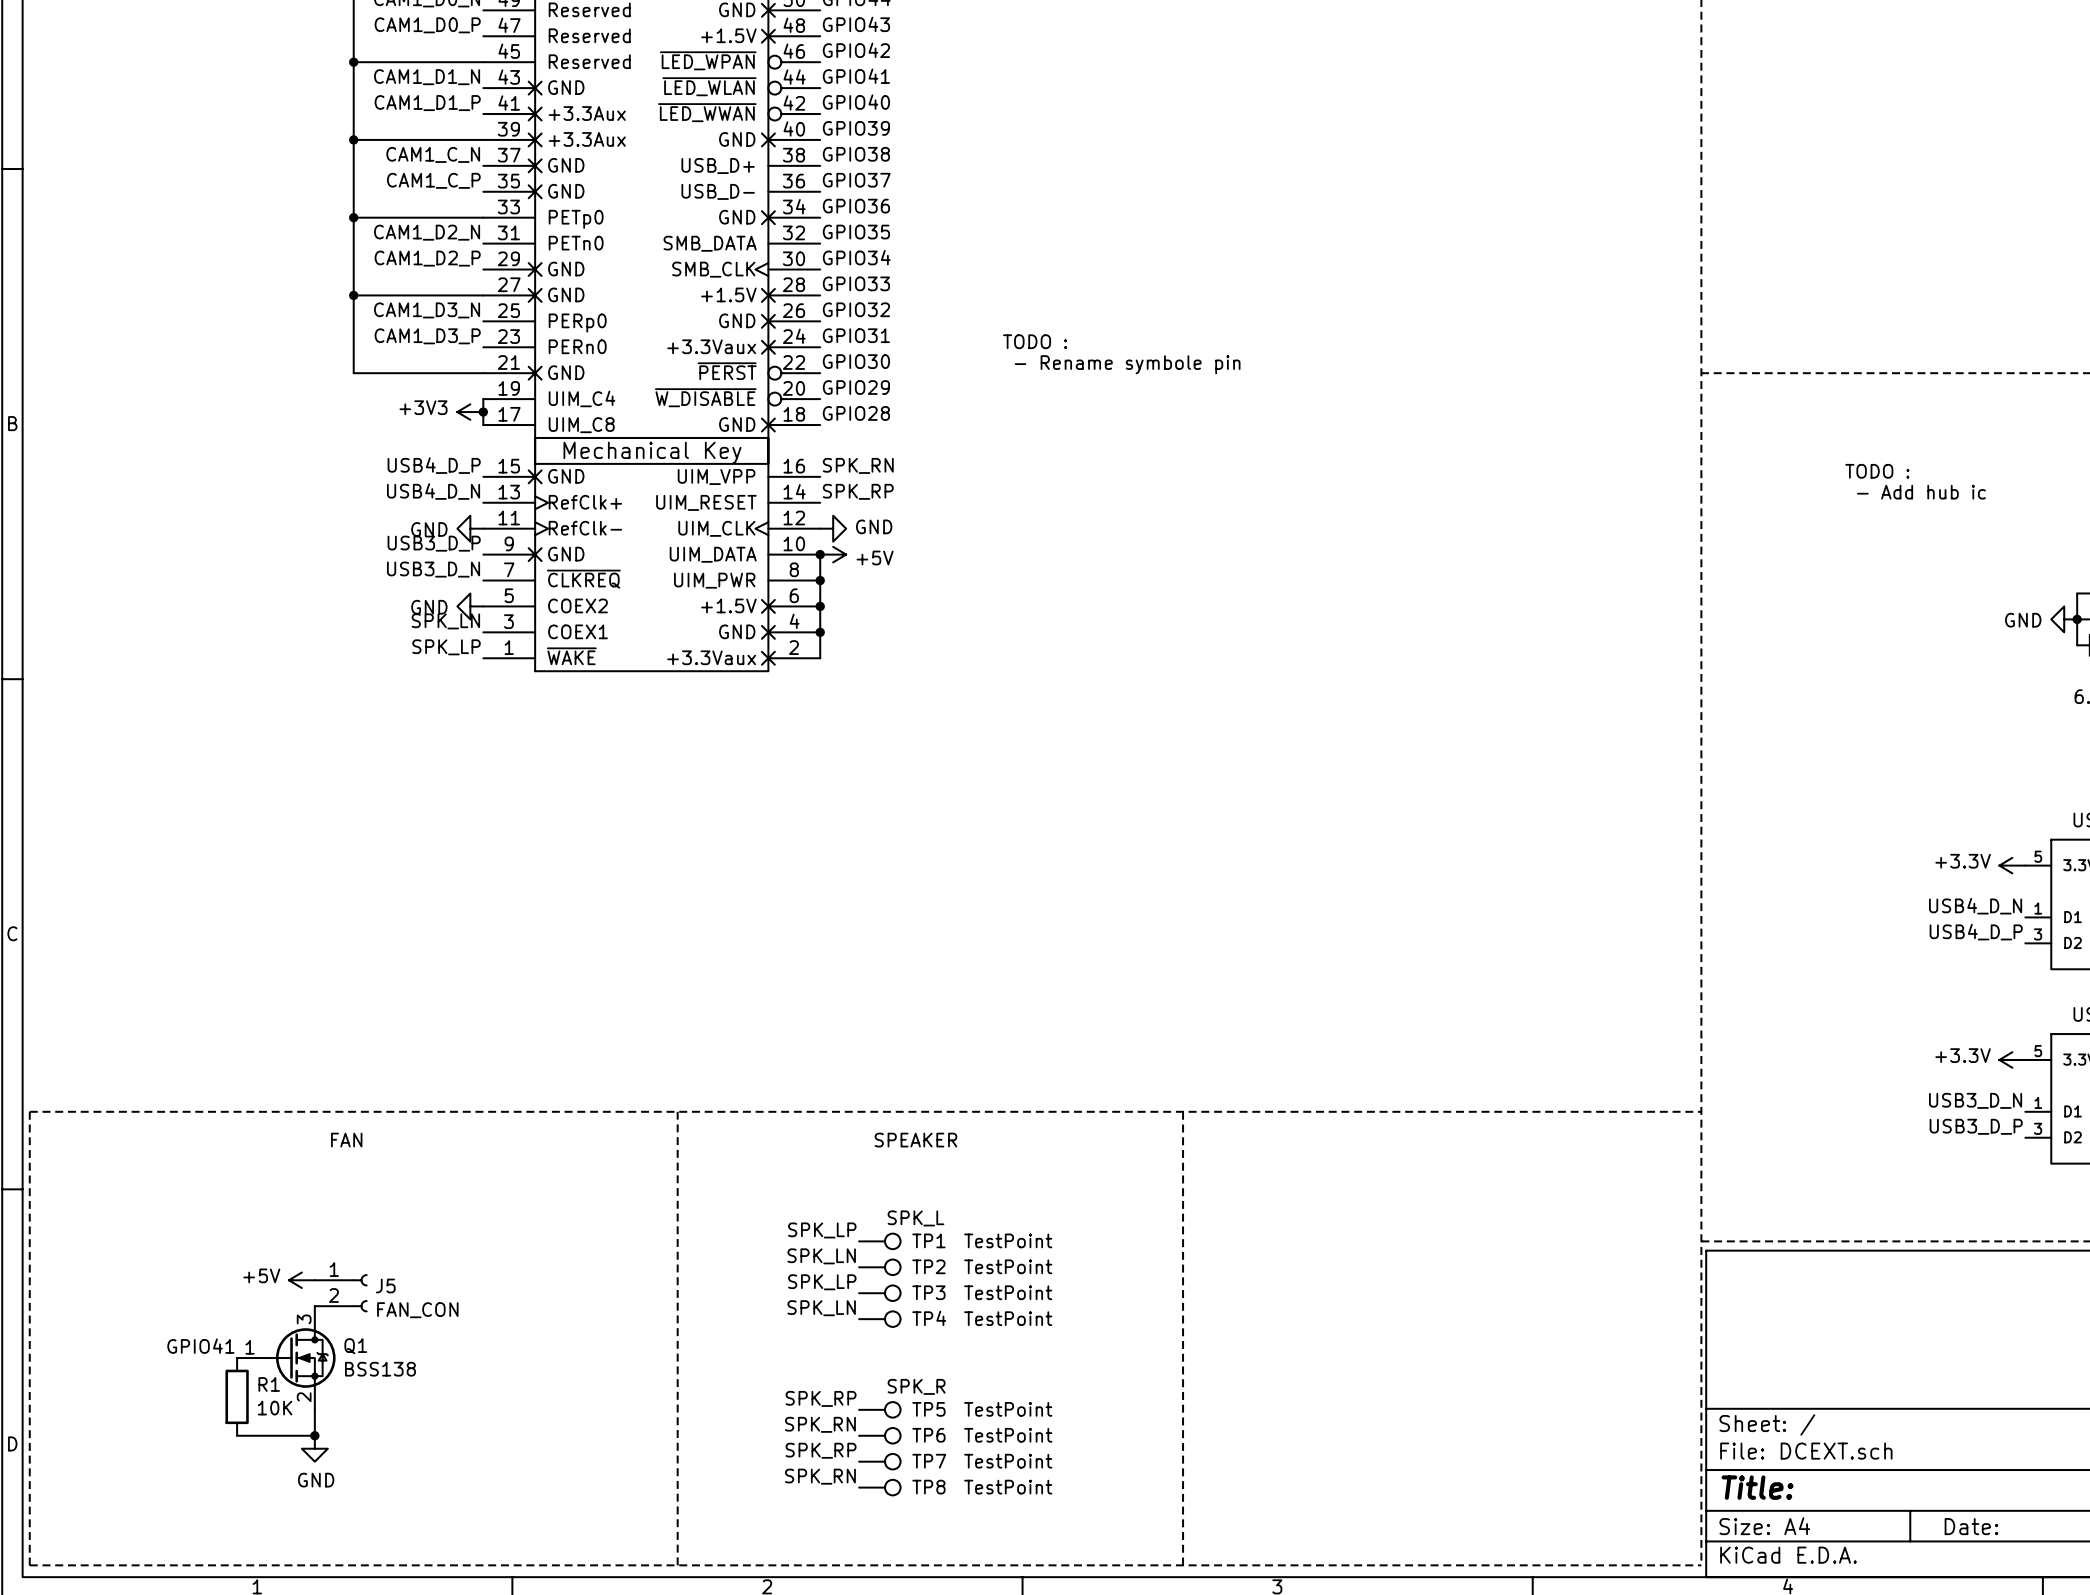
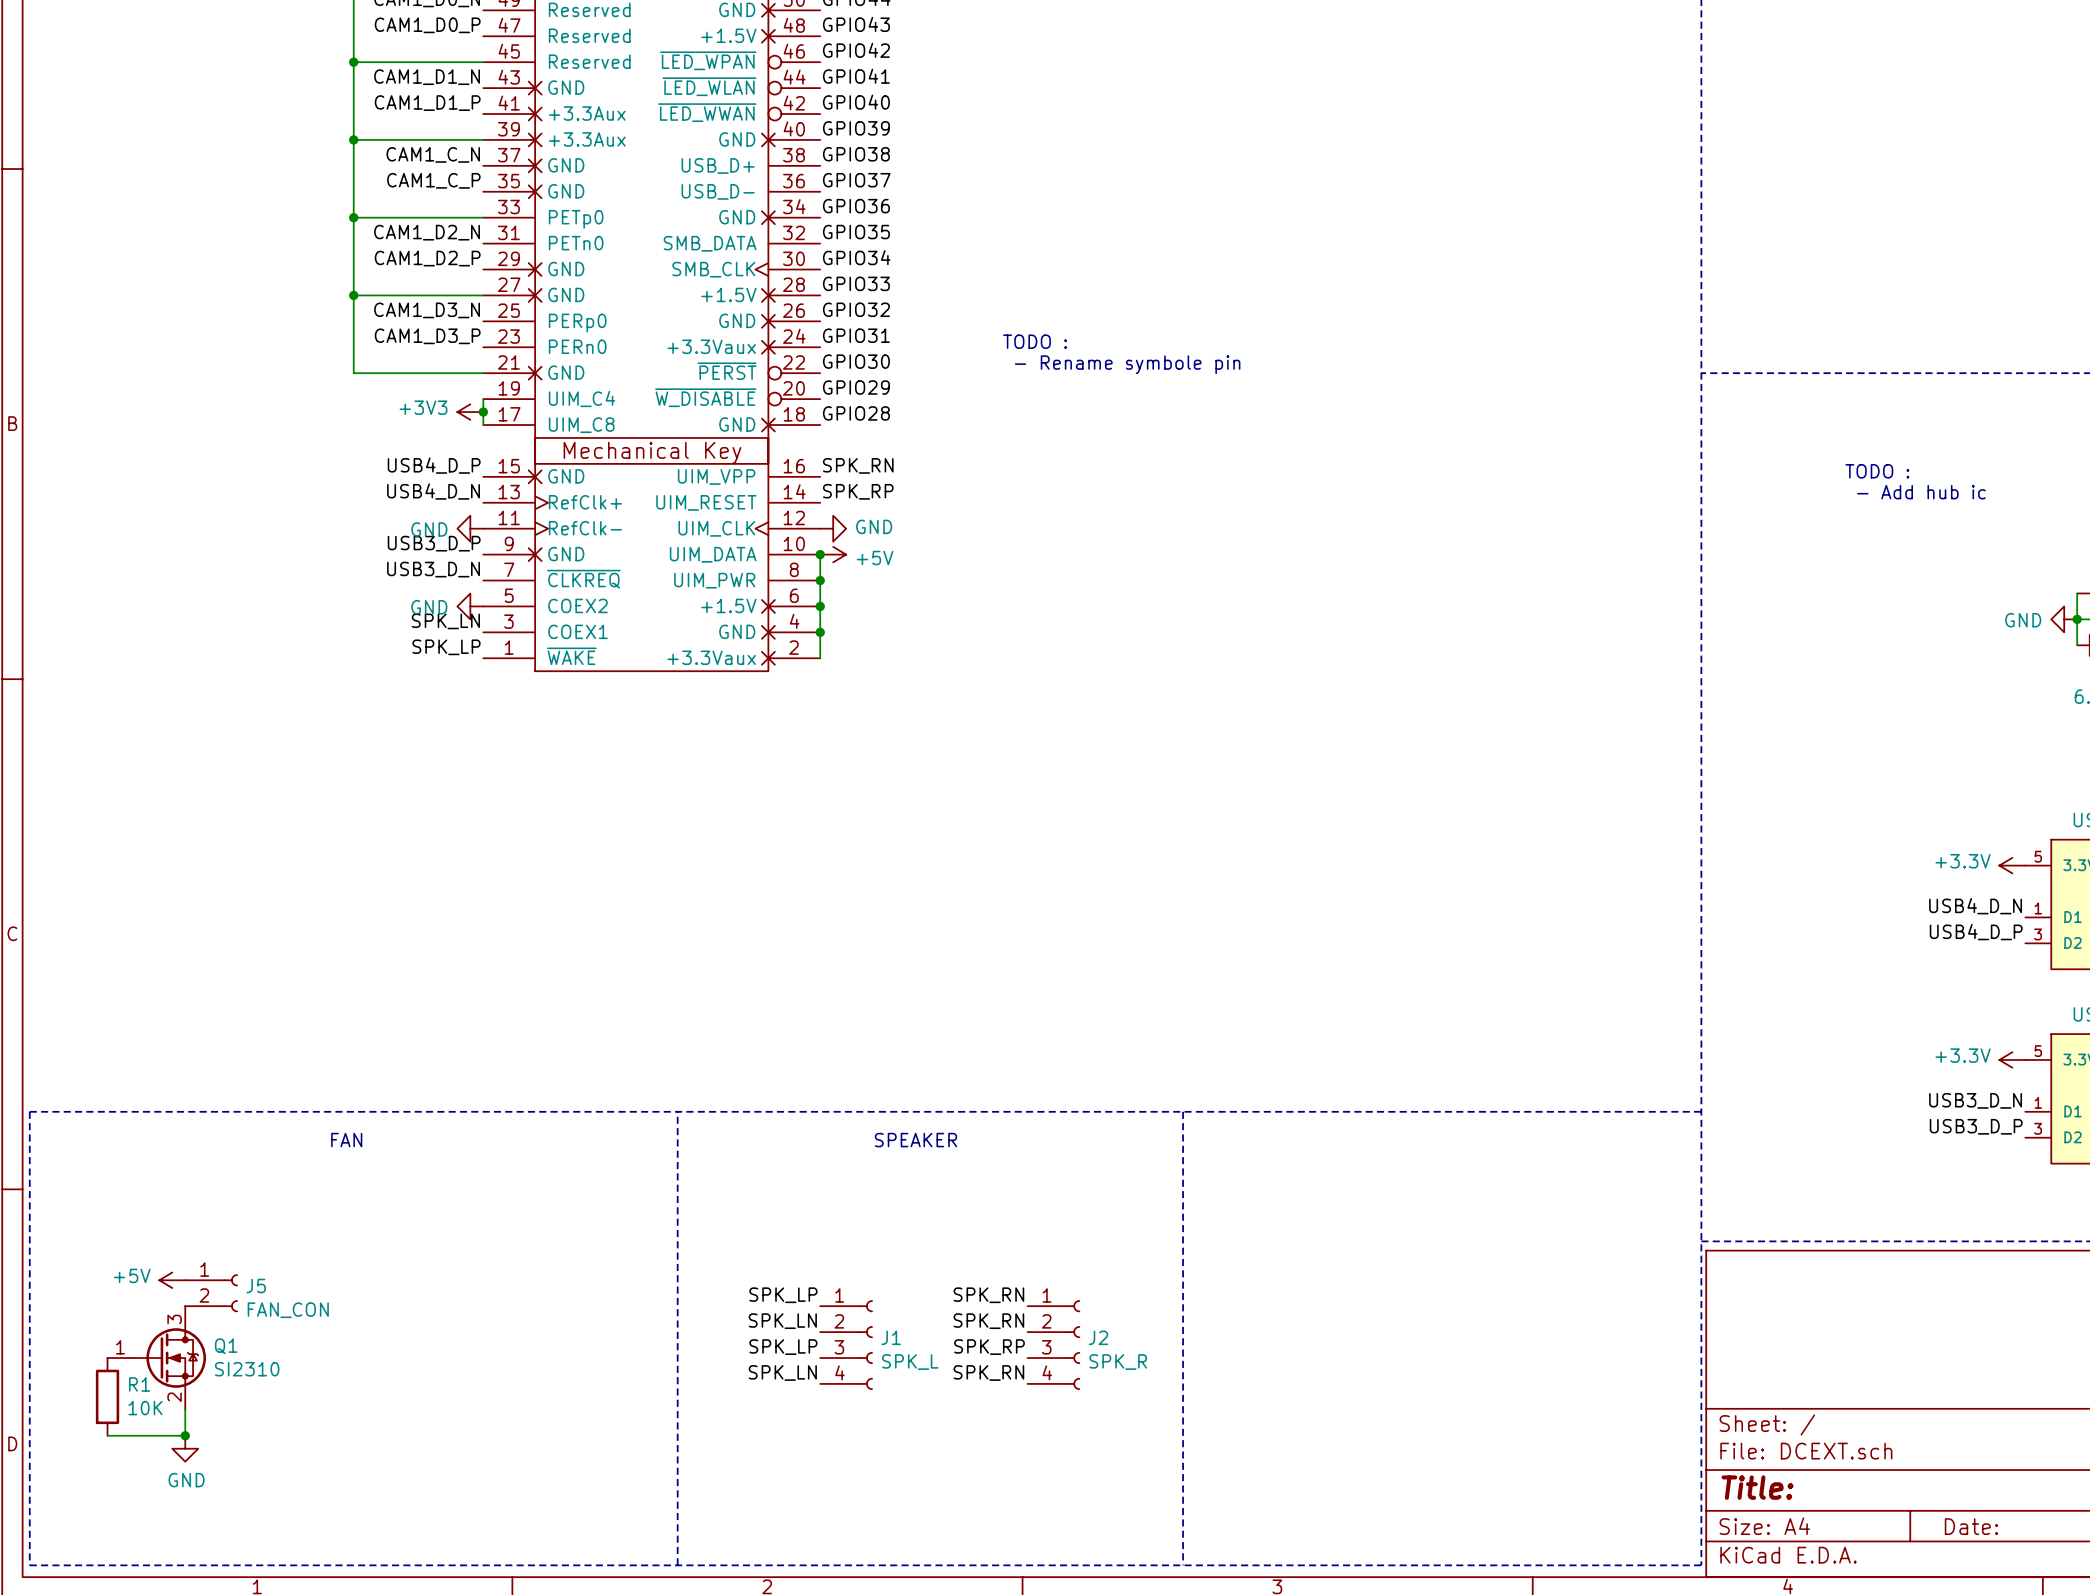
text: SPK_L (915, 1218) -> none
label: SPK_LP (822, 1230) -> none
TP1: TestPoint (879, 1241) -> none
label: SPK_LN (821, 1256) -> none
TP2: TestPoint (879, 1267) -> none
power symbol position: +5V (301, 1280) -> +5V (172, 1280)
label: SPK_LP (822, 1282) -> none
J5 position: (341, 1293) -> (211, 1293)
TP3: TestPoint (879, 1293) -> none
label: none -> SPK_LP (783, 1295)
label: none -> SPK_RN (988, 1295)
label: SPK_LN (821, 1308) -> none
TP4: TestPoint (879, 1319) -> none
label: none -> SPK_LN (782, 1321)
label: none -> SPK_RN (988, 1321)
J1: none -> SPK_L (846, 1345)
J2: none -> SPK_R (1053, 1345)
label: GPIO41 (200, 1346) -> none
label: none -> SPK_LP (783, 1347)
label: none -> SPK_RP (989, 1347)
Q1 position: (286, 1358) -> (156, 1358)
Q1 value: BSS138 (380, 1369) -> SI2310 (247, 1369)
label: none -> SPK_RN (988, 1372)
text: SPK_R (916, 1386) -> none
R1 position: (237, 1396) -> (107, 1396)
label: SPK_RP (821, 1398) -> SPK_LN (782, 1372)
wire: (314, 1409) (314, 1435) (237, 1435) -> (185, 1409) (185, 1435) (107, 1435)
TP5: TestPoint (879, 1409) -> none
label: SPK_RN (820, 1424) -> none
junction: none -> (185, 1435)
junction: (314, 1435) -> none
TP6: TestPoint (879, 1435) -> none
power symbol position: GND (314, 1448) -> GND (185, 1448)
label: SPK_RP (821, 1450) -> none
TP7: TestPoint (879, 1461) -> none
label: SPK_RN (820, 1476) -> none
TP8: TestPoint (879, 1487) -> none

